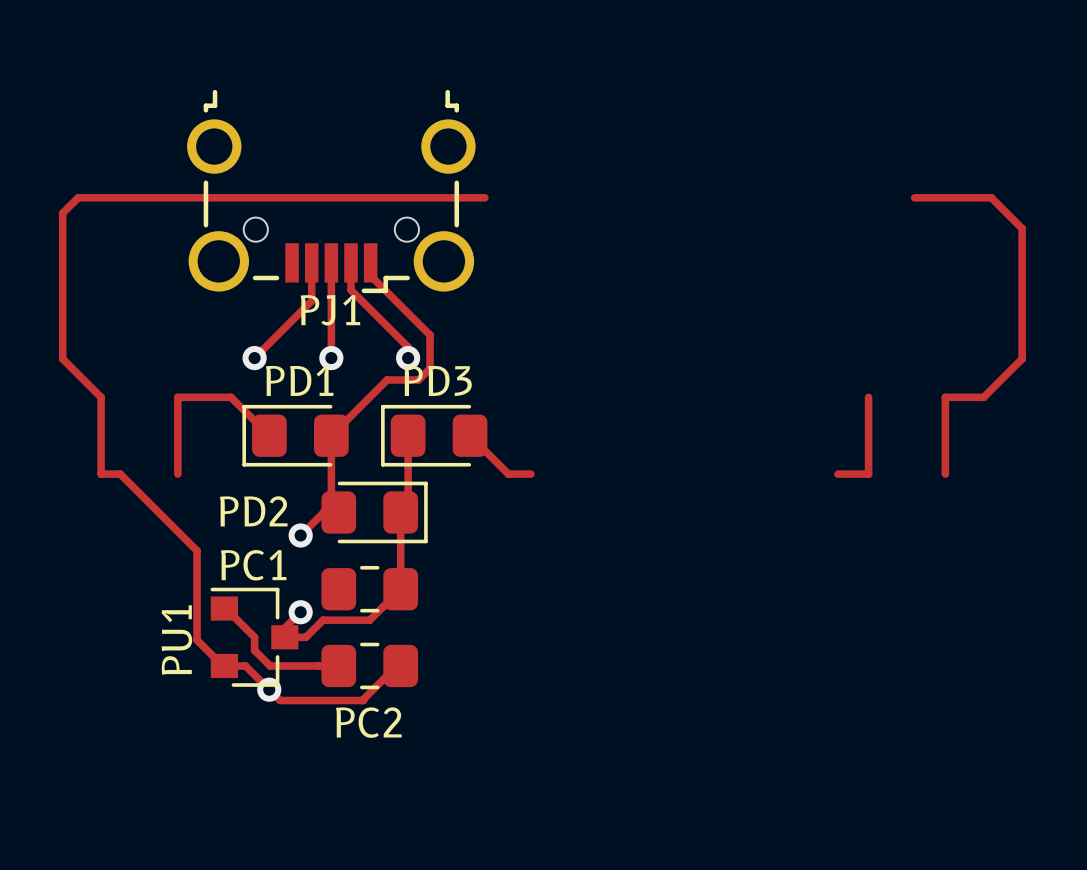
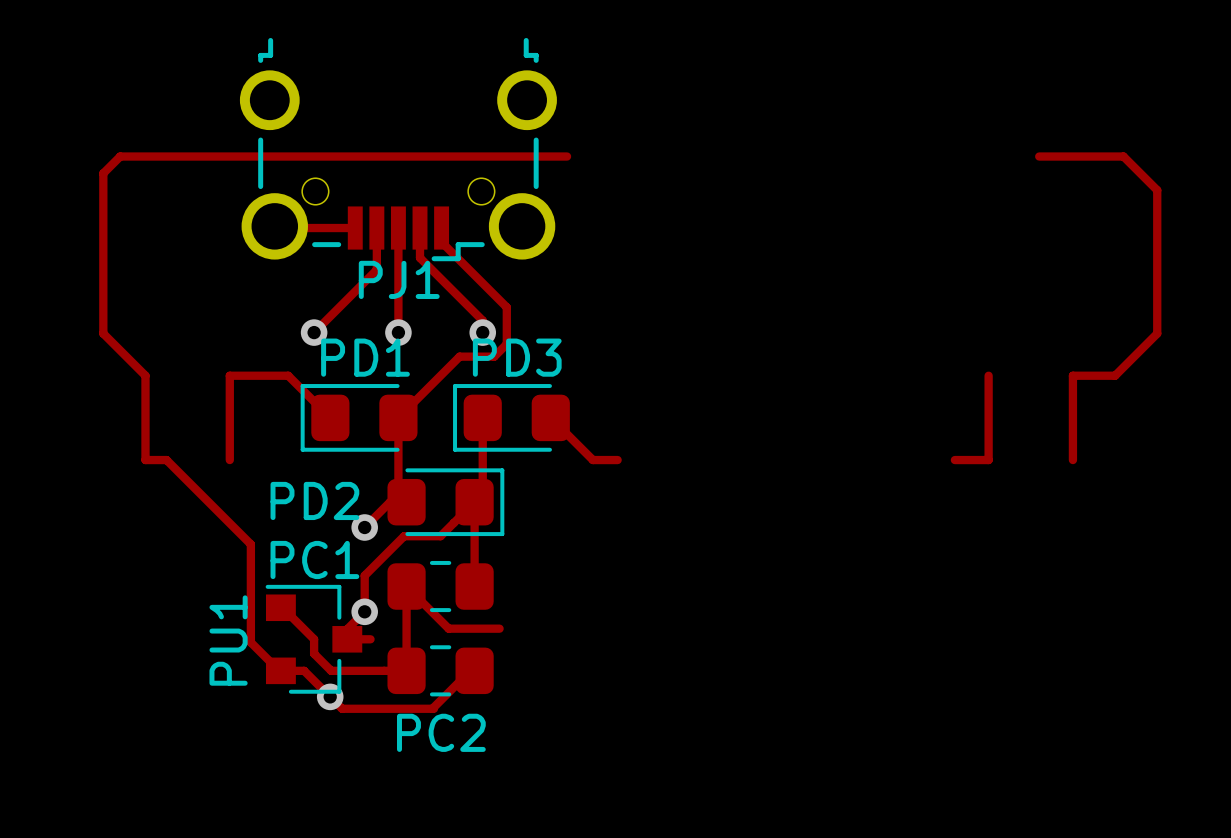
track: none -> (274, 226) (276, 228) (355, 228)
track: none -> (474, 502) (440, 536) (404, 536) (364, 575) (364, 611)
track: (400, 589) (369, 620) (323, 620) (305, 637) -> none
track: none -> (499, 628) (448, 628) (406, 586) (406, 670)

